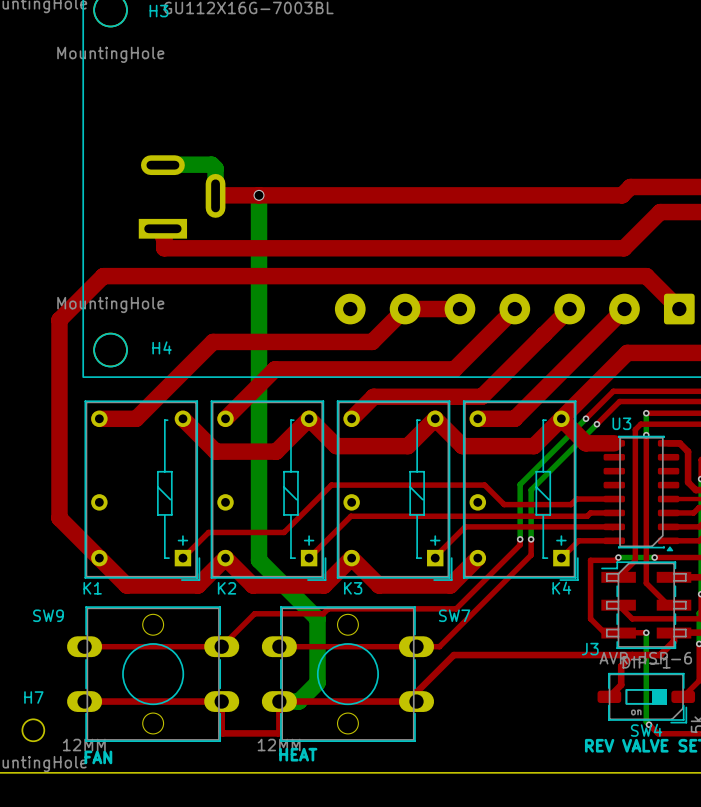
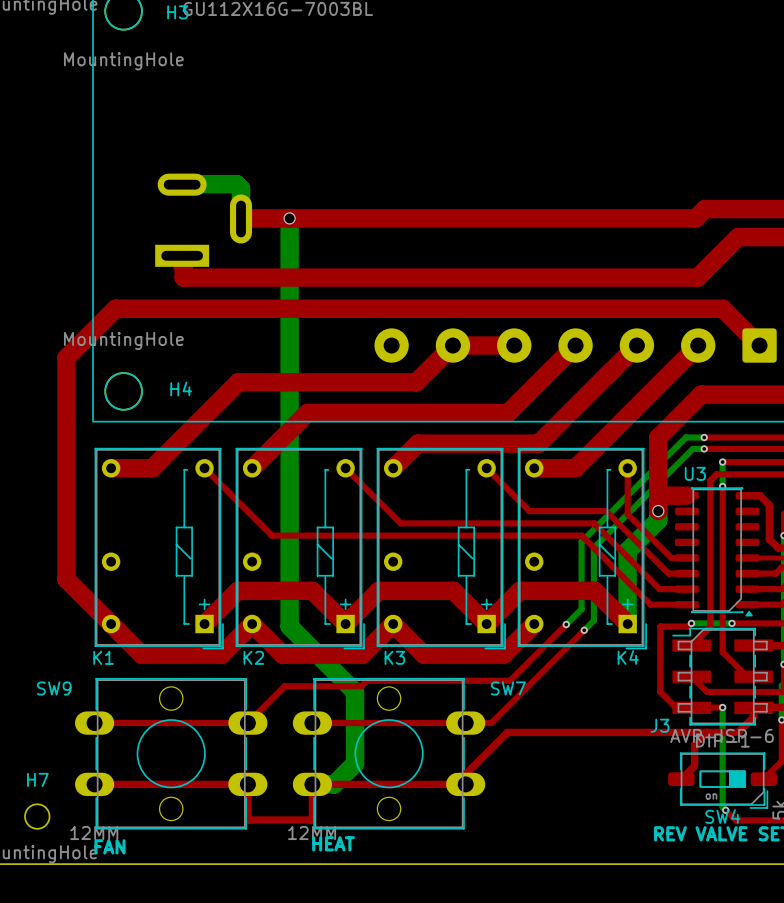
top track: (588, 391) (534, 446) (462, 446) -> (668, 573) (606, 511) (529, 511) (517, 498)
top track: none -> (658, 437) (658, 511)
top track: (629, 391) (613, 391) (585, 418) -> none
bottom track: none -> (704, 437) (685, 437) (655, 468)
via: none -> (704, 437)
top track: (629, 401) (619, 401) (596, 424) -> none
bottom track: none -> (704, 448) (692, 448) (667, 474)
via: none -> (704, 448)
top track width: thick (182, 418) (215, 451) -> thin (204, 468) (241, 504)
top track: (309, 418) (276, 451) (215, 451) -> (650, 604) (581, 535) (271, 535) (241, 504)
top track width: thick (309, 418) (336, 446) -> thin (345, 468) (376, 498)
top track: (435, 418) (407, 446) (336, 446) -> none
top track width: thick (435, 418) (462, 446) -> thin (486, 468) (517, 498)
top track: (561, 418) (585, 443) (588, 443) -> (627, 468) (627, 514) (671, 557)
via: (585, 418) -> none
via: (596, 424) -> none
bottom track: none -> (658, 511) (658, 520) (627, 550) (627, 623)
via: none -> (658, 511)
top track: (600, 499) (576, 499) (571, 504) (504, 504) (484, 485) (331, 485) (284, 532) (208, 532) -> (345, 624) (312, 590) (237, 590) (233, 595)
top track: (597, 512) (590, 512) (587, 516) (350, 516) (338, 528) -> (627, 624) (594, 590) (519, 590) (486, 624) (453, 590) (378, 590)
top track: (589, 526) (465, 526) (435, 556) -> (659, 589) (593, 523) (400, 523) (376, 498)
top track width: thin (338, 528) (309, 558) -> thick (378, 590) (345, 624)
top track width: thin (208, 532) (182, 558) -> thick (233, 595) (204, 624)
top track: (520, 539) (520, 544) (506, 558) -> none
bottom track: none -> (581, 603) (581, 609) (566, 624)
via: (520, 539) -> none
top track: (531, 539) (531, 555) (522, 563) -> none
bottom track: none -> (593, 603) (593, 620) (584, 630)
via: (531, 539) -> none
top track: (581, 540) (578, 540) (561, 558) -> none
via: none -> (566, 624)
via: none -> (584, 630)

